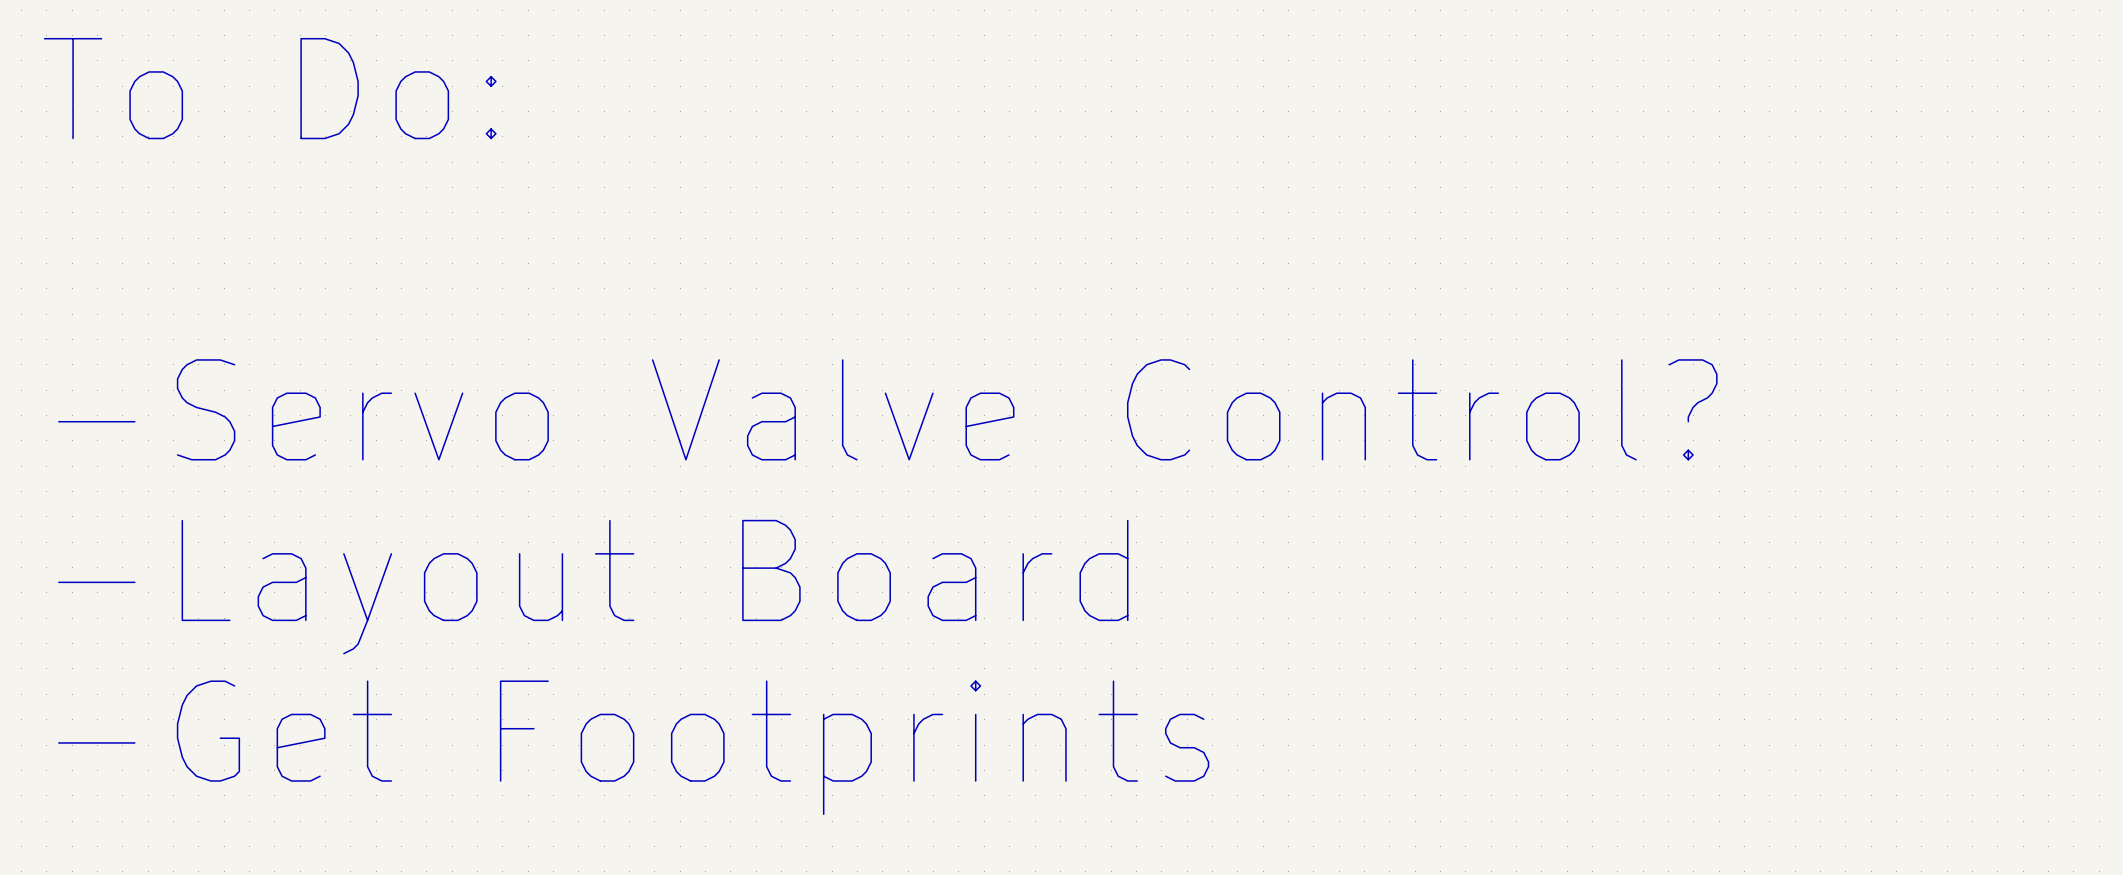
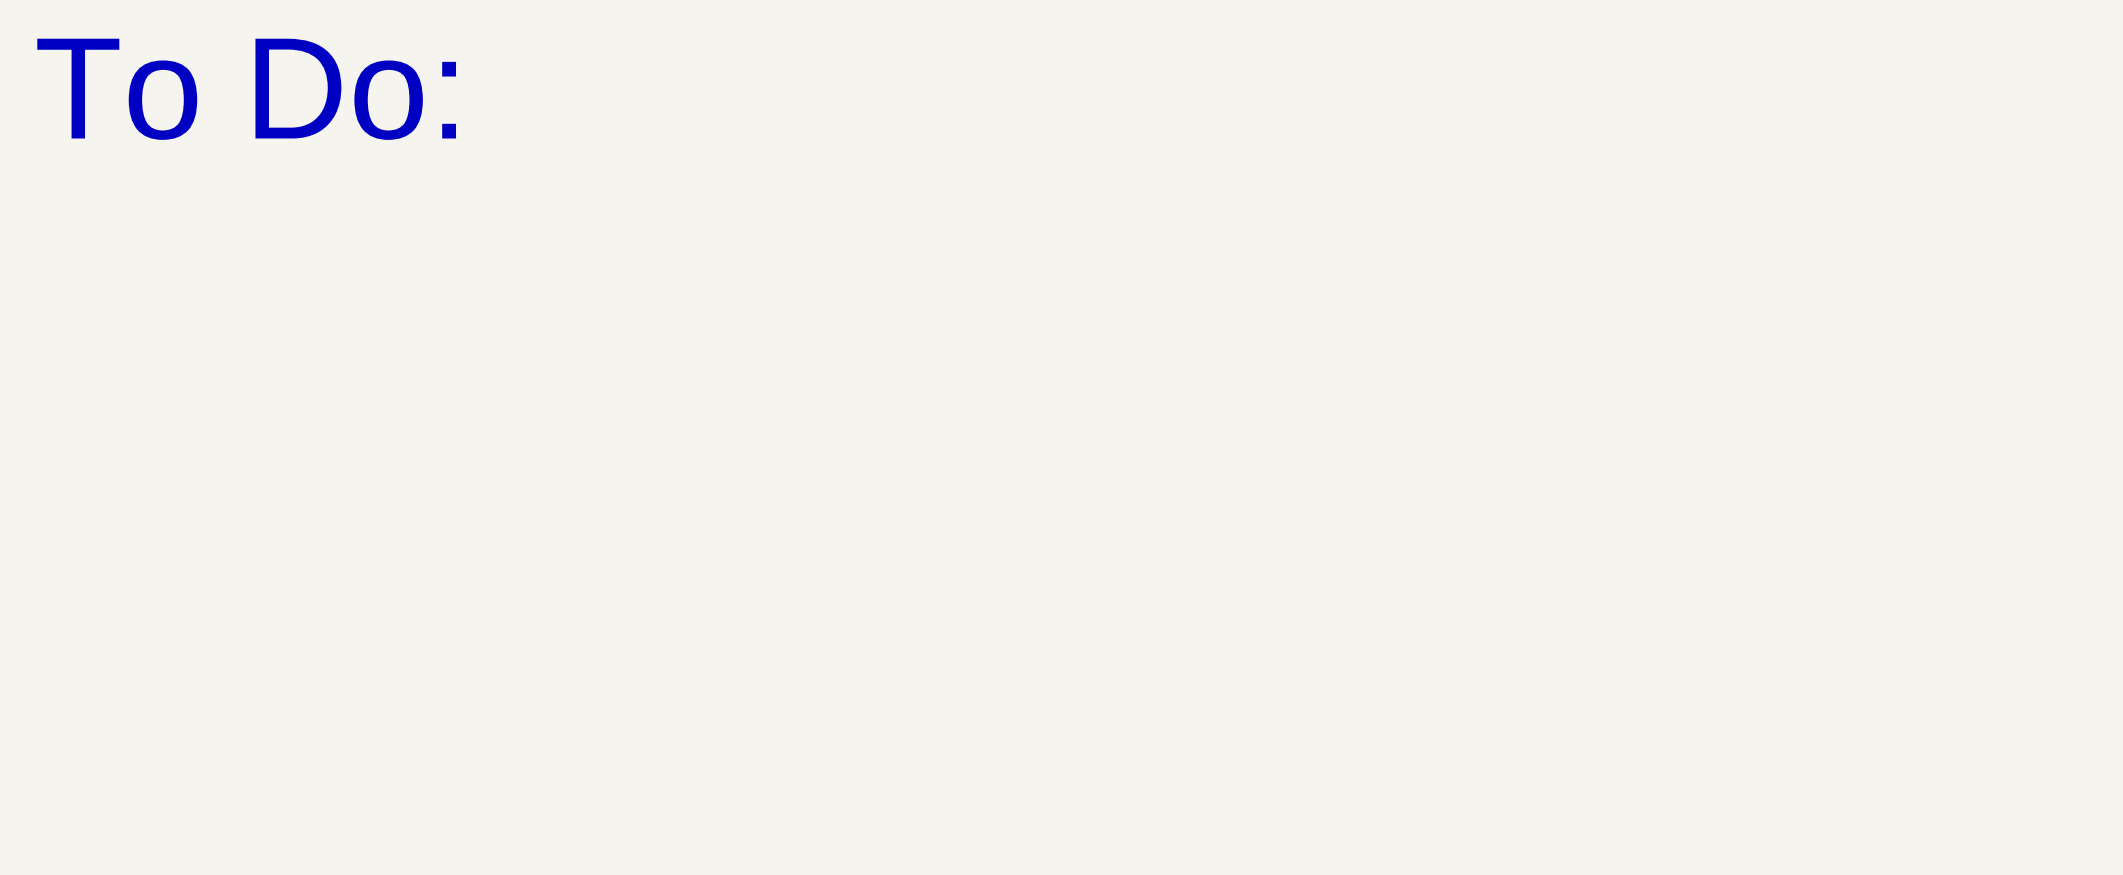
text: -Servo Valve Control? (887, 409) -> none
text: -Layout Board (593, 587) -> none
text: -Get Footprints (633, 747) -> none

